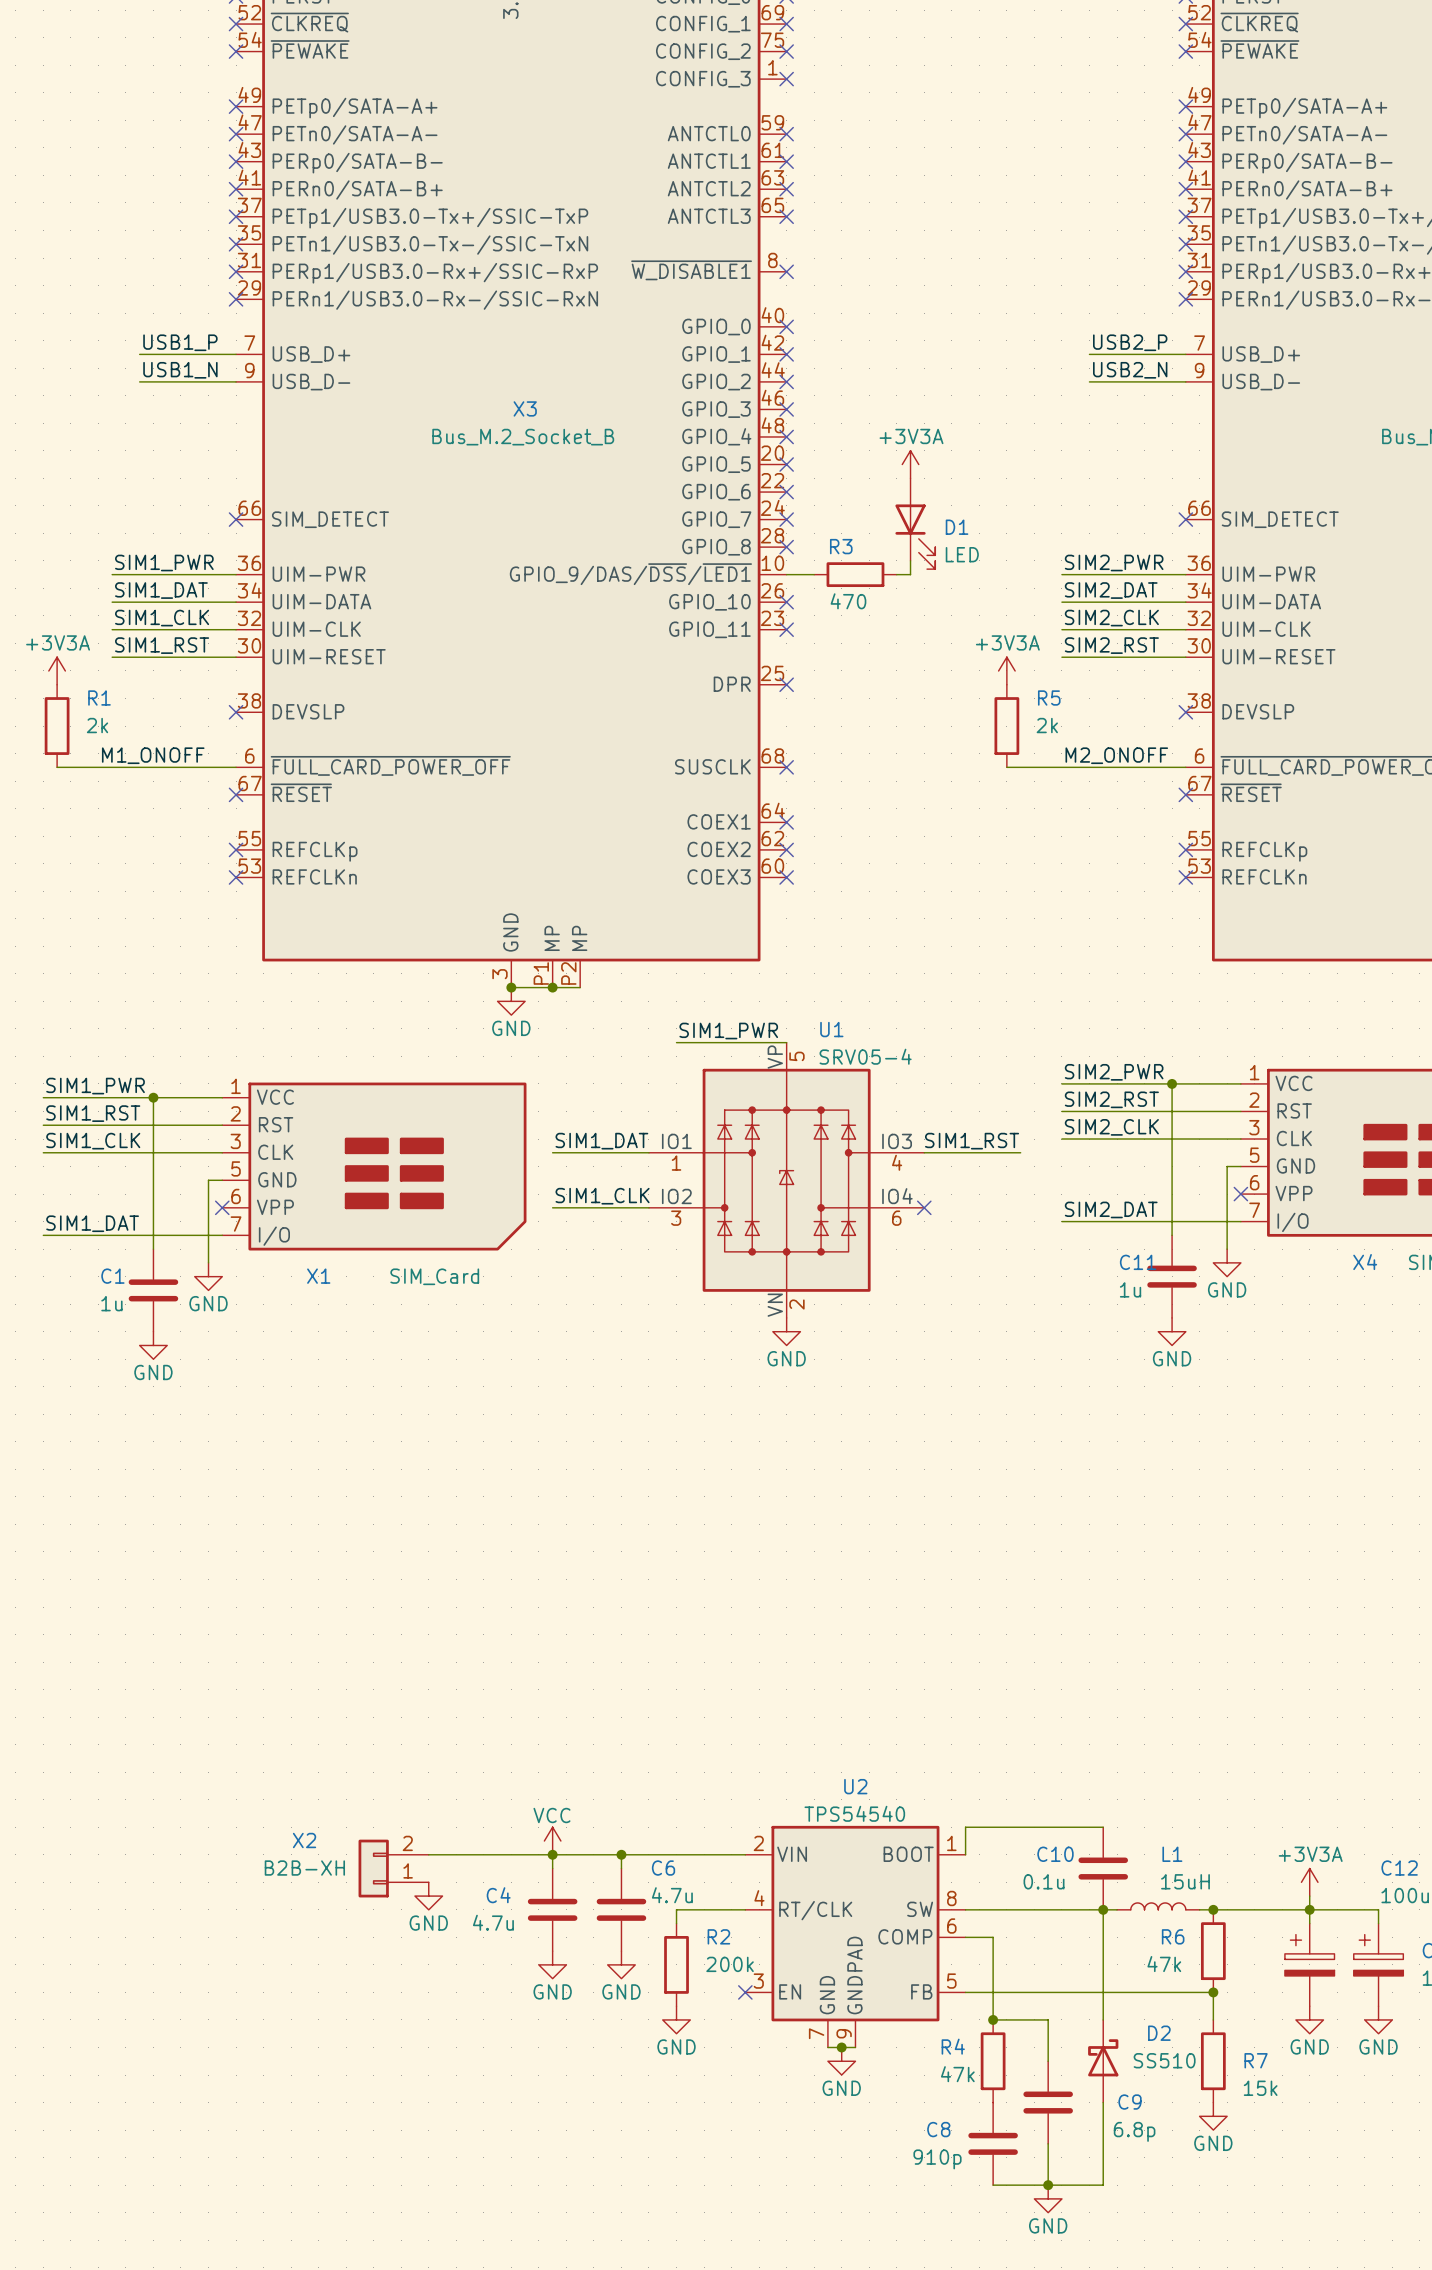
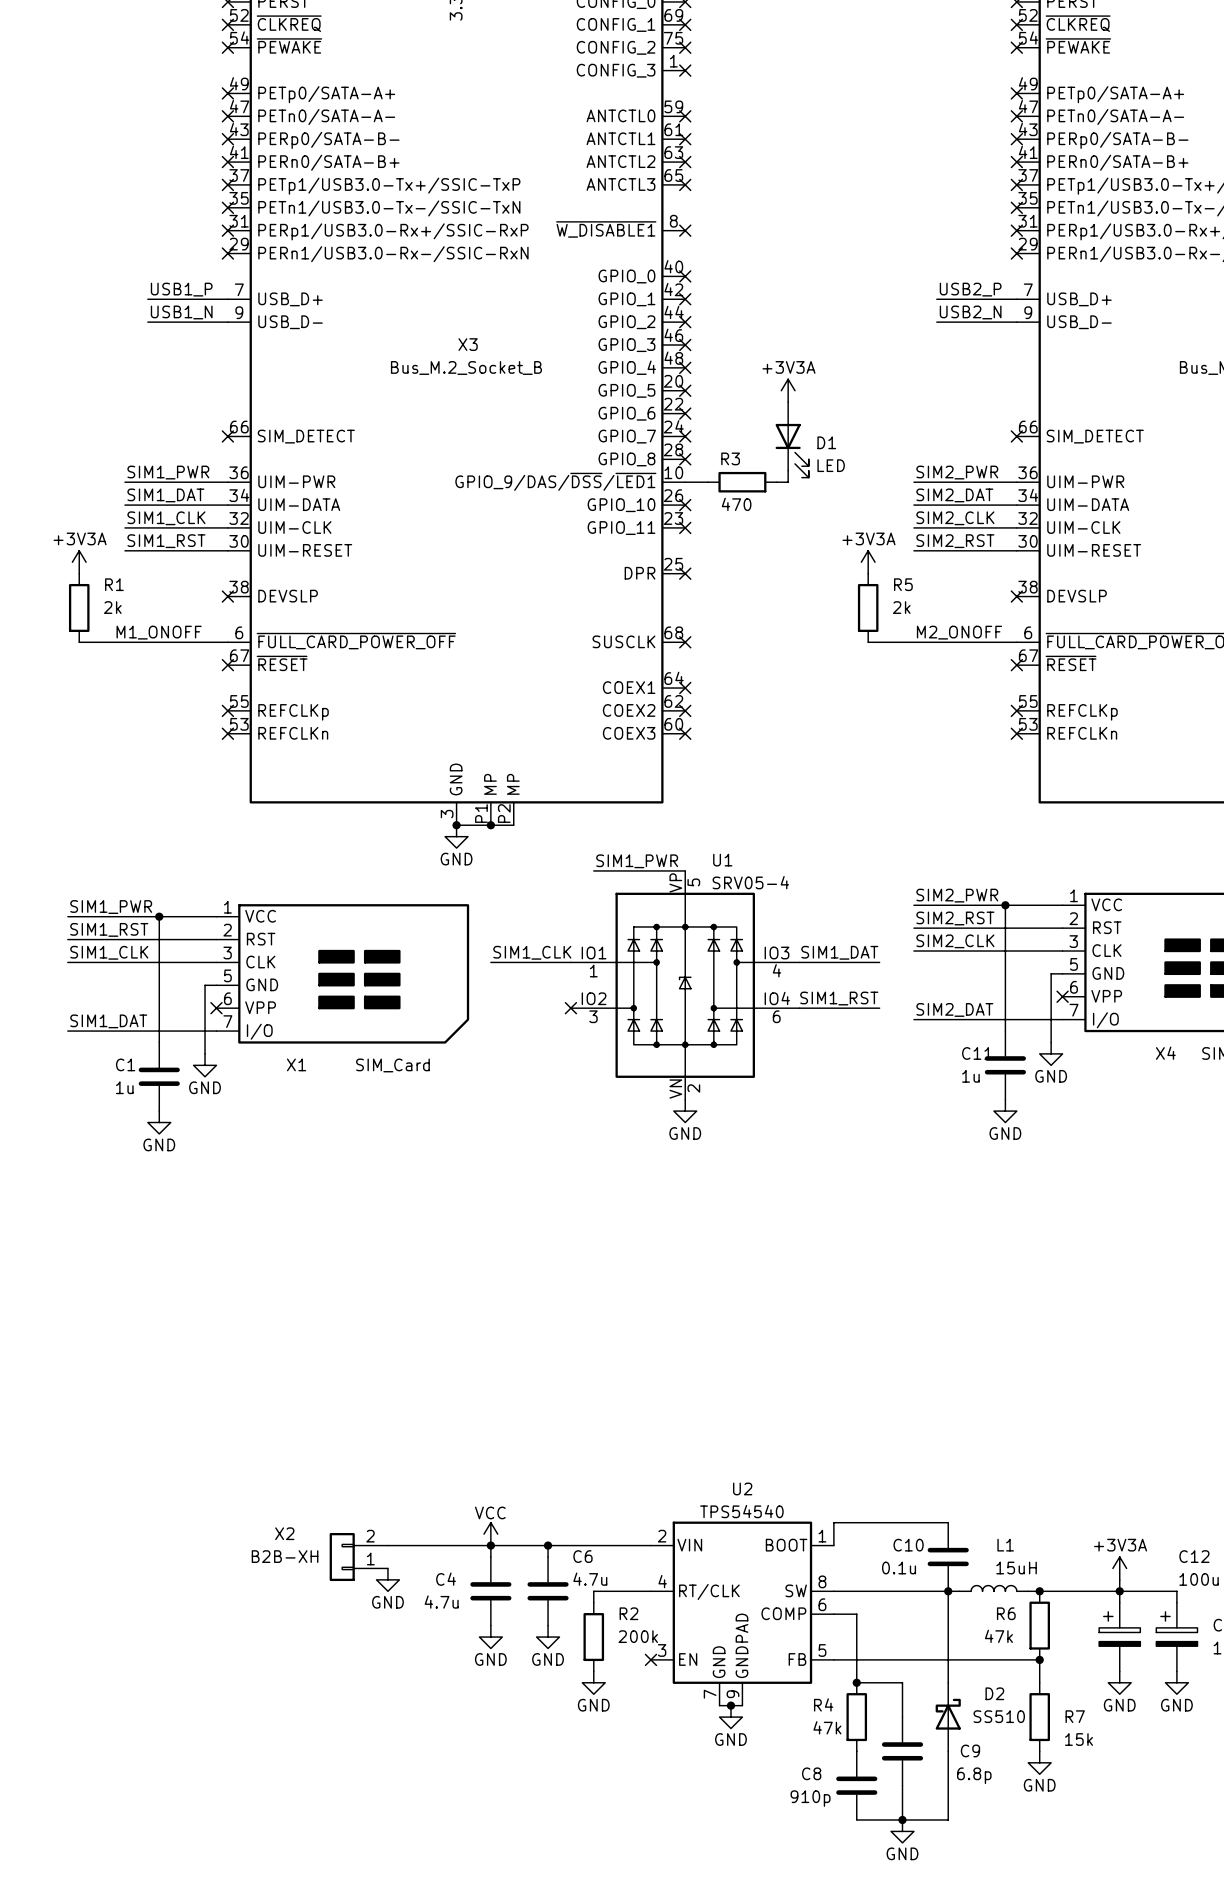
label: SIM1_DAT (601, 1141) -> SIM1_CLK (532, 952)
label: SIM1_RST (972, 1141) -> SIM1_DAT (839, 952)
label: SIM1_CLK (602, 1196) -> none
label: none -> SIM1_RST (839, 998)
wire: (552, 1207) (648, 1207) -> none
no-connect mark: none -> (570, 1008)
wire: none -> (799, 1008) (879, 1008)
no-connect mark: (924, 1207) -> none

